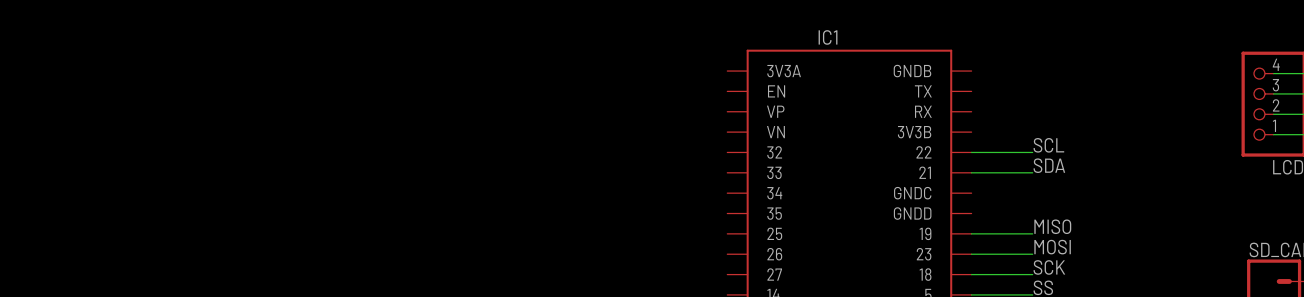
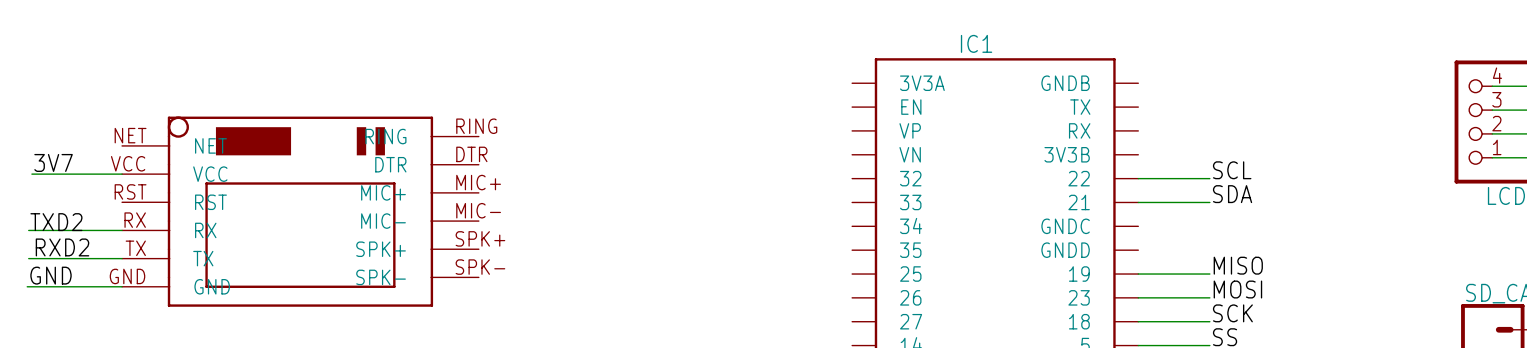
label: none -> 3V7 (53, 162)
wire: none -> (31, 174) (122, 174)
part: none -> (300, 211)
label: none -> TXD2 (56, 222)
wire: none -> (28, 230) (122, 230)
label: none -> RXD2 (62, 247)
wire: none -> (28, 258) (122, 258)
label: none -> GND (51, 275)
wire: none -> (27, 286) (122, 286)

